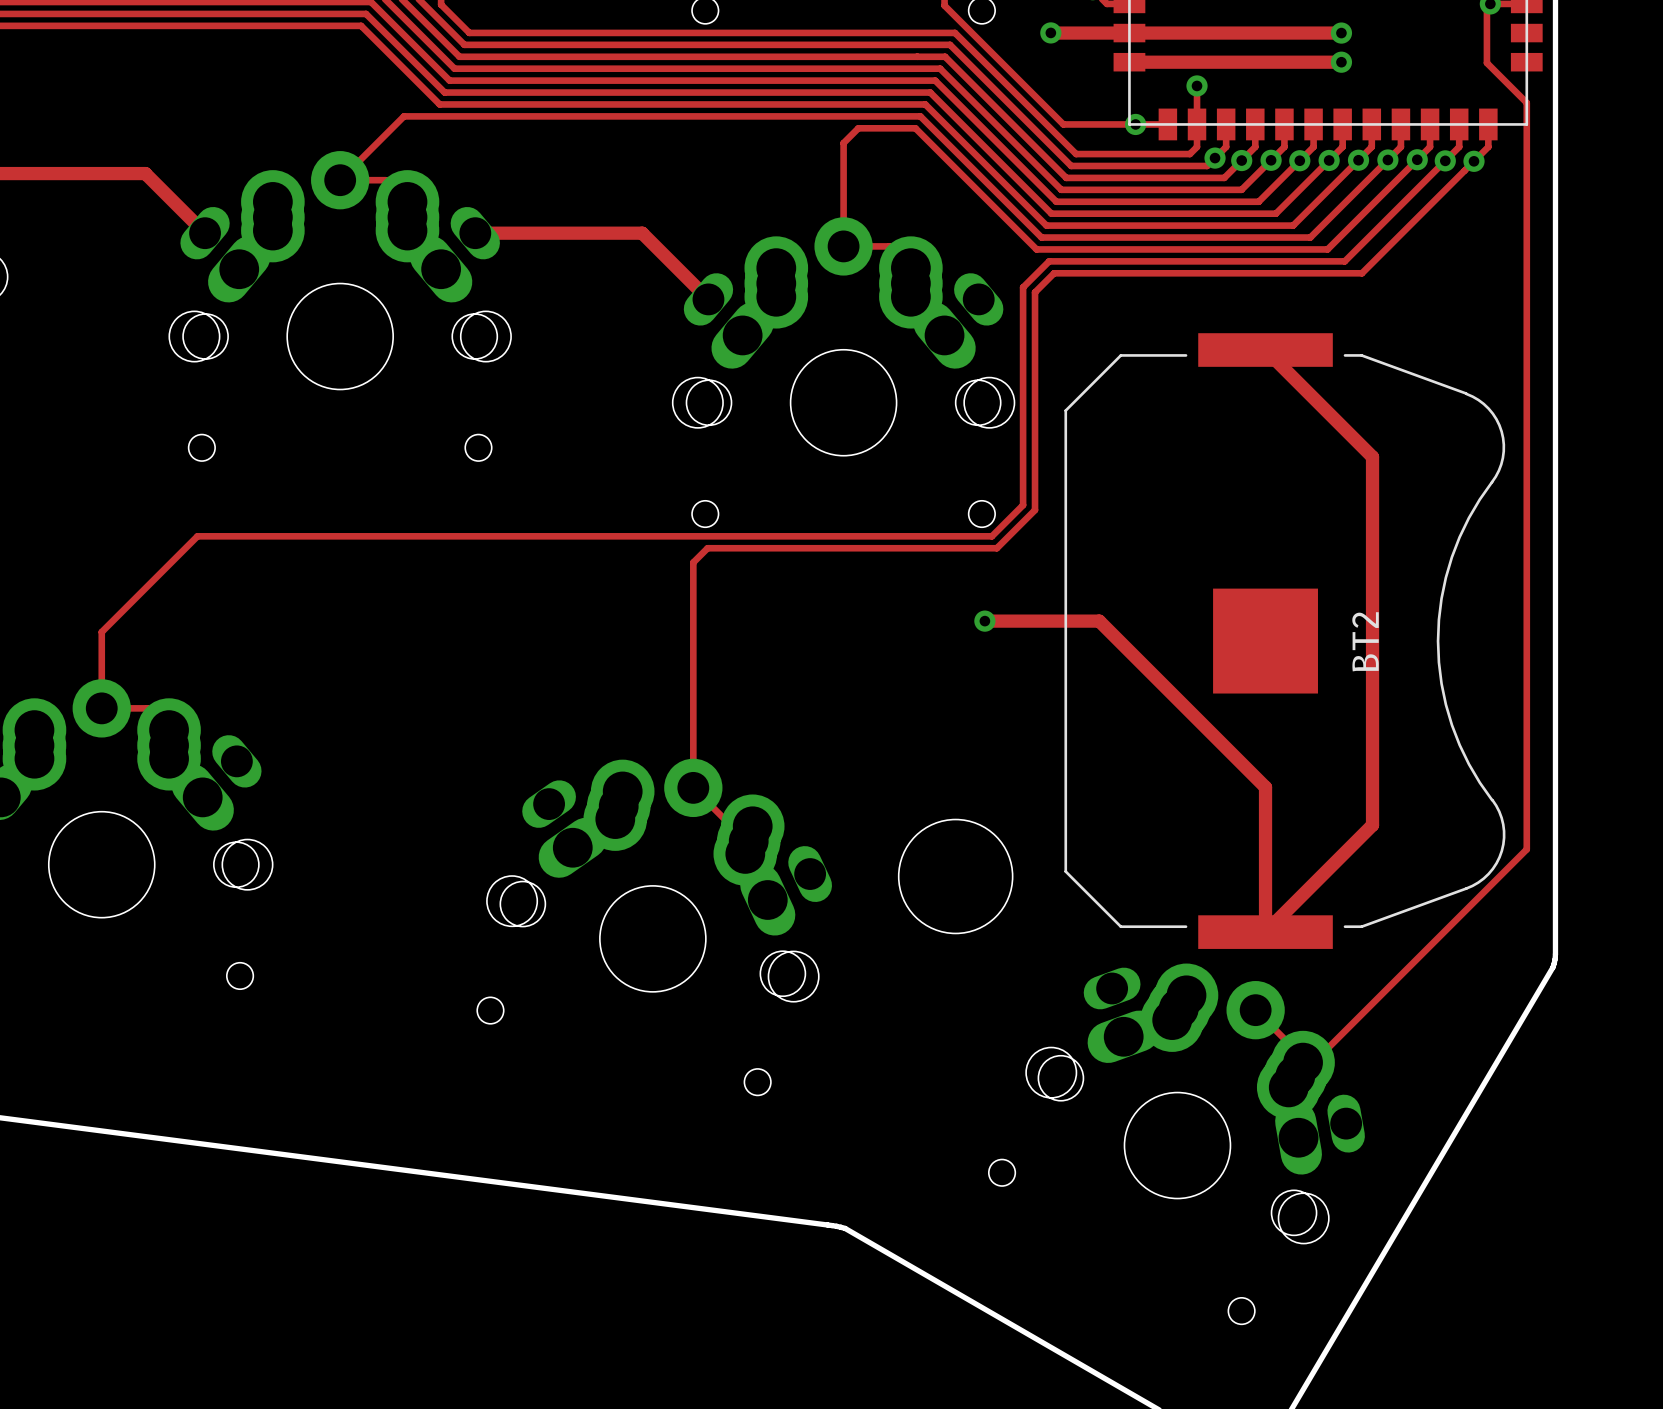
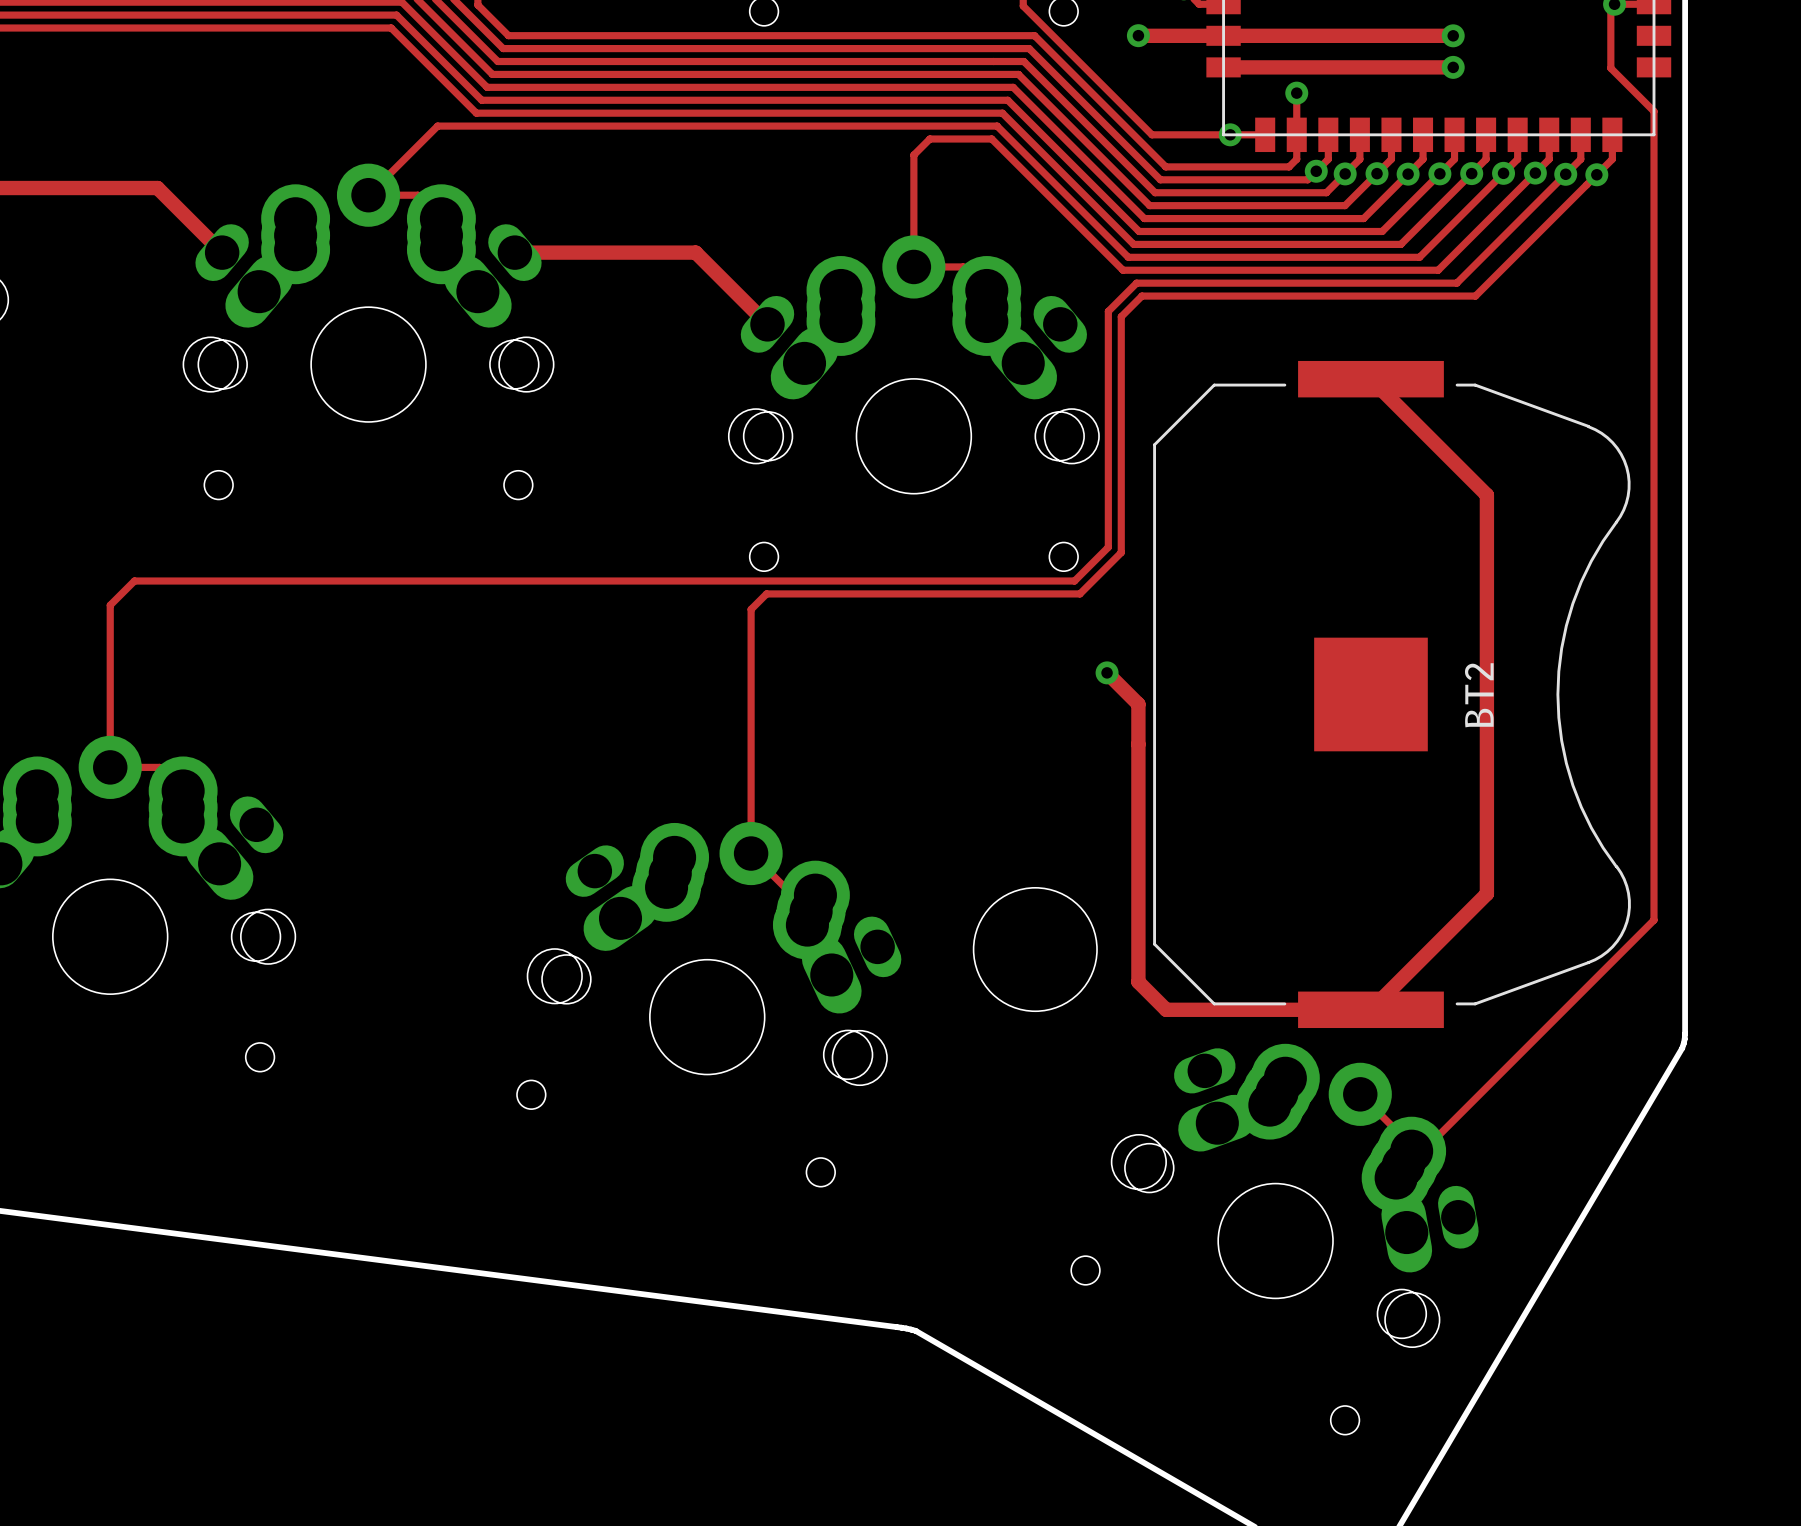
track: (197, 536) (101, 632) -> (213, 581) (134, 581) (110, 605) (110, 684)
track: (984, 621) (1099, 621) (1265, 787) (1265, 932) -> (1107, 672) (1138, 704) (1138, 981) (1166, 1009) (1370, 1009)
via position: (984, 621) -> (1107, 672)

